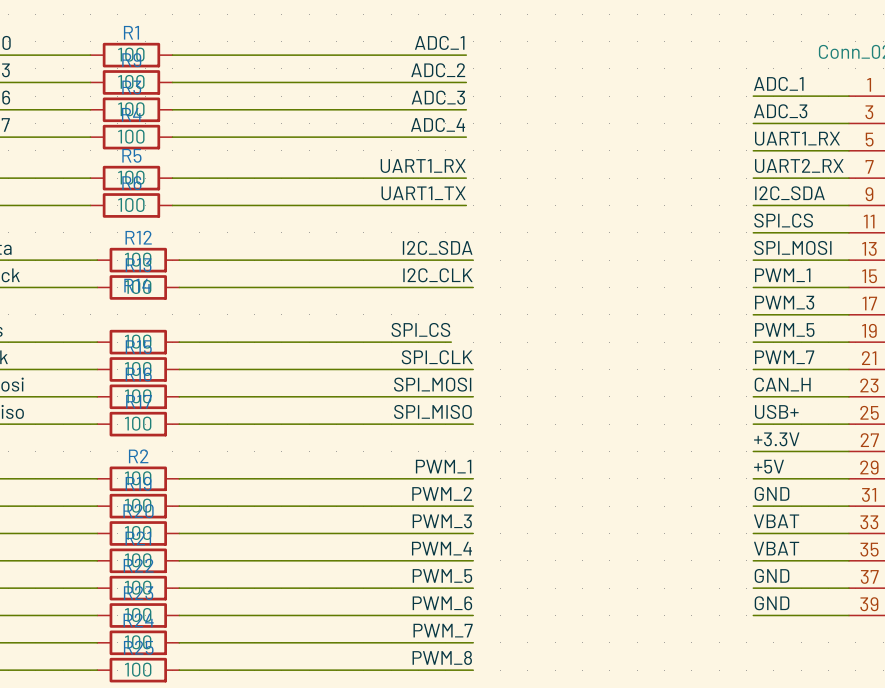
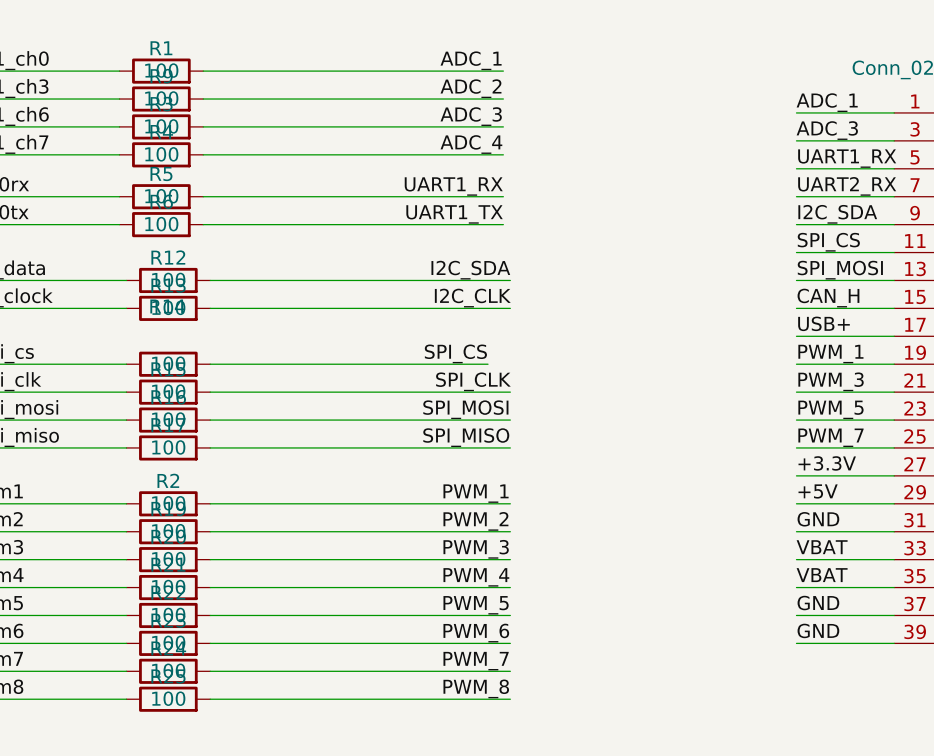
label: PWM_1 (782, 275) -> CAN_H (828, 298)
label: PWM_3 (784, 302) -> USB+ (823, 323)
label: PWM_5 (784, 330) -> PWM_1 (830, 354)
label: PWM_7 (784, 357) -> PWM_3 (831, 381)
label: CAN_H (782, 384) -> PWM_5 (830, 409)
label: USB+ (776, 411) -> PWM_7 (830, 437)

